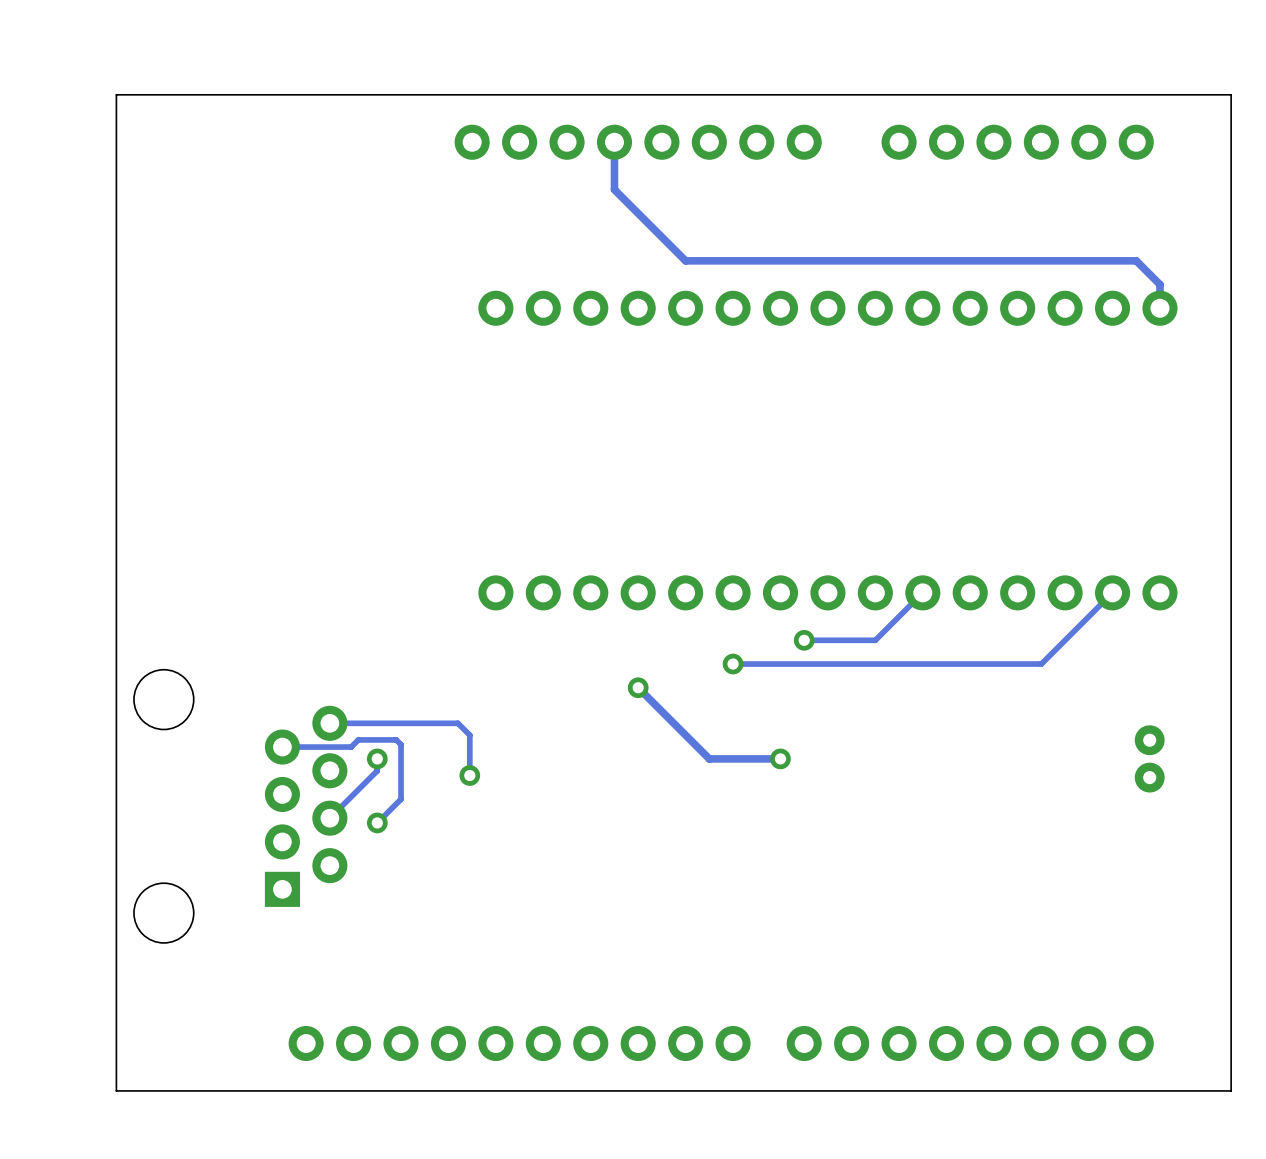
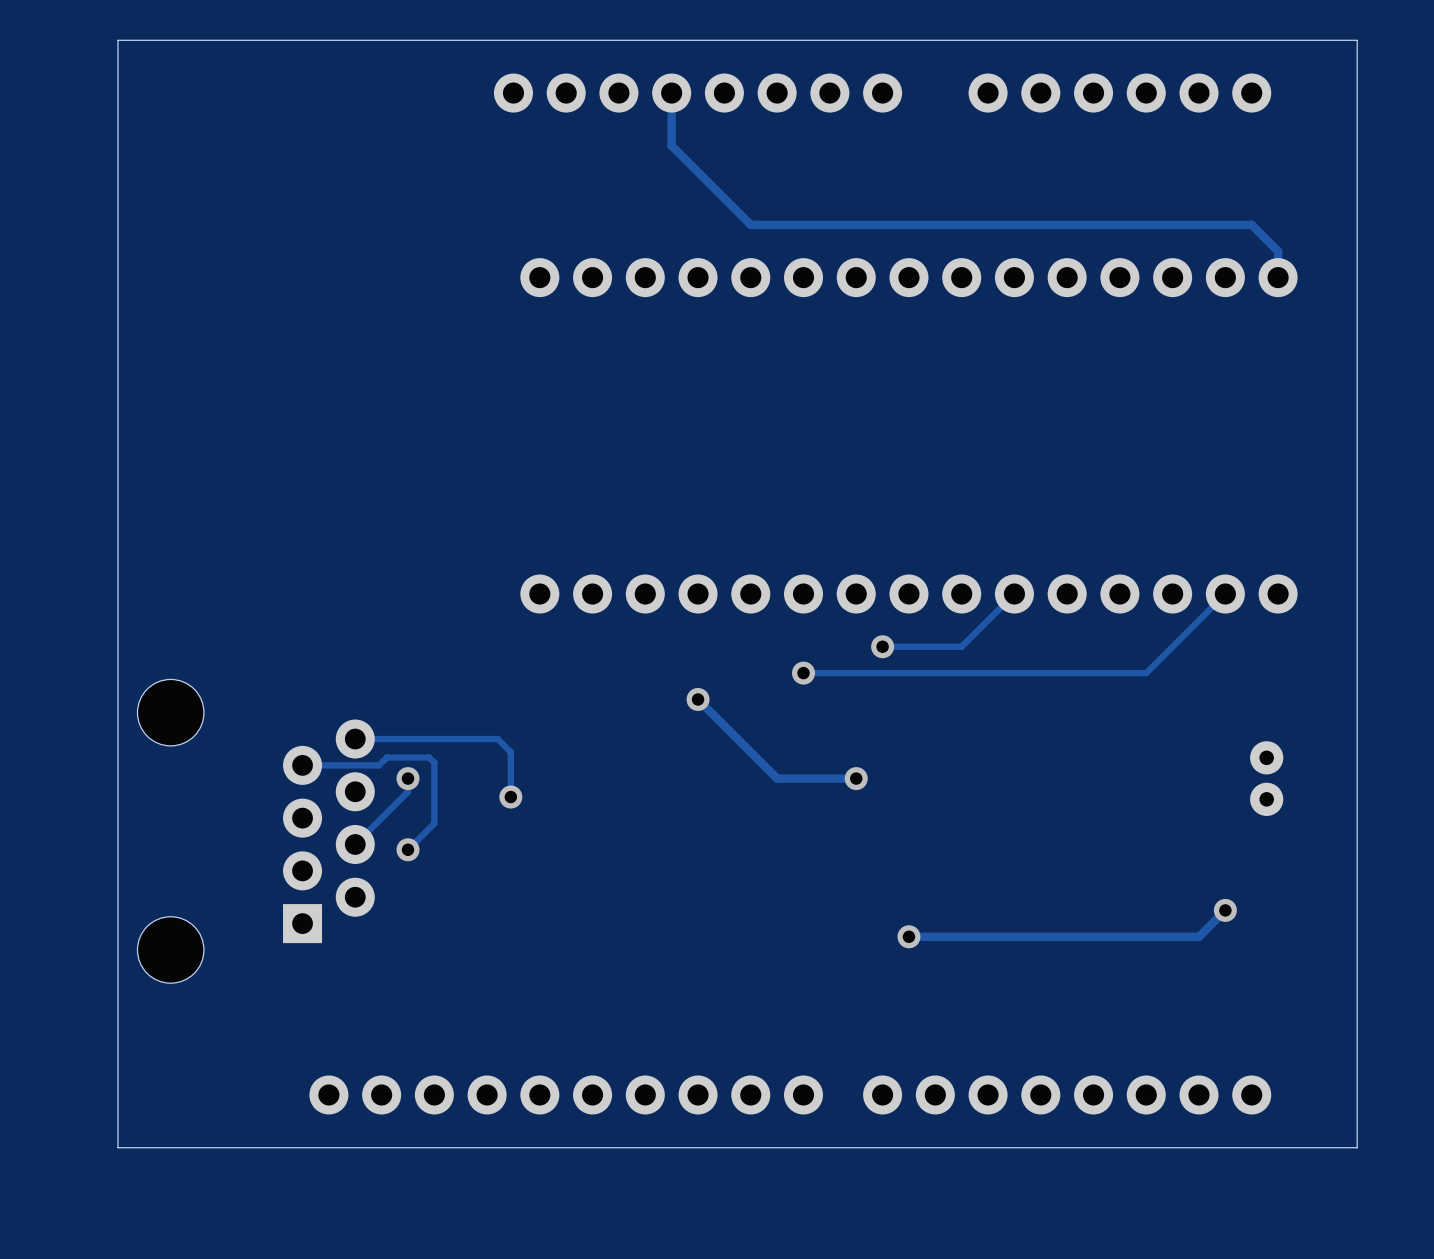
track: none -> (1225, 910) (1199, 936) (908, 936)
via: none -> (1225, 910)
via: none -> (908, 936)

